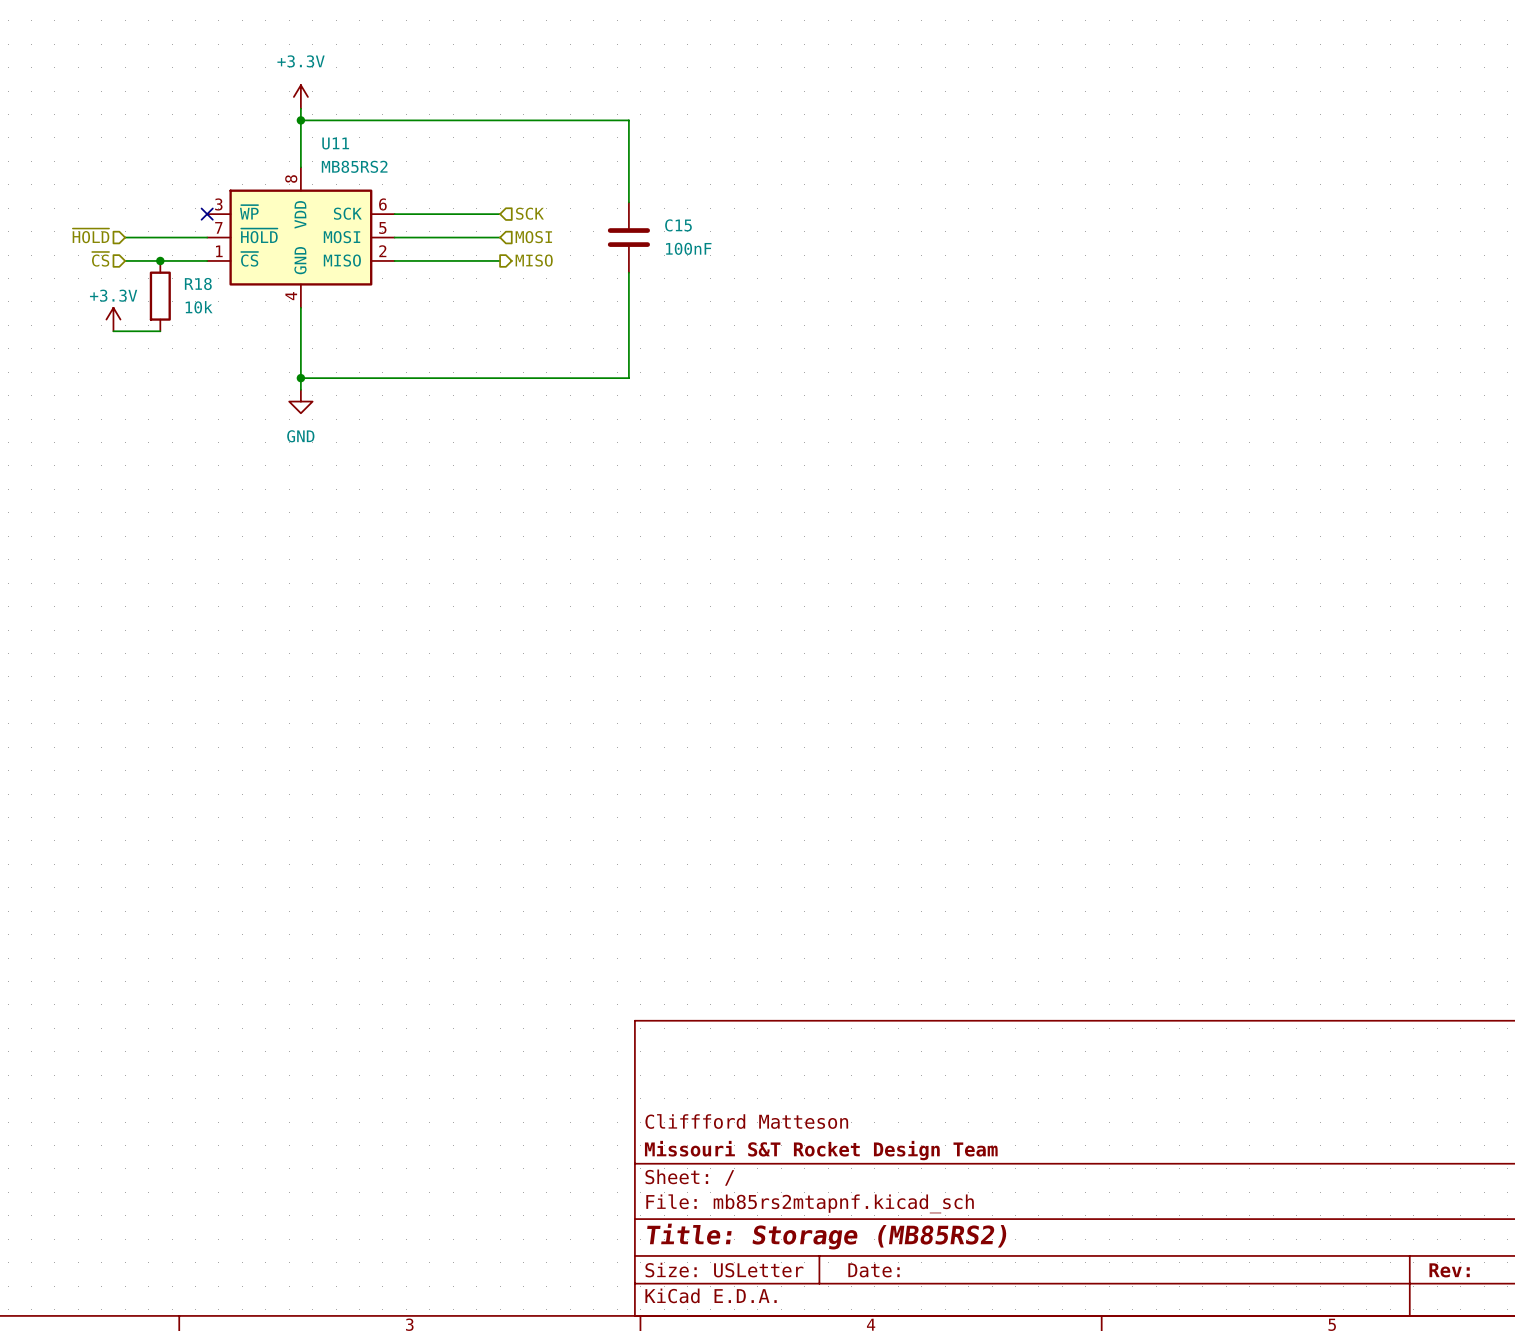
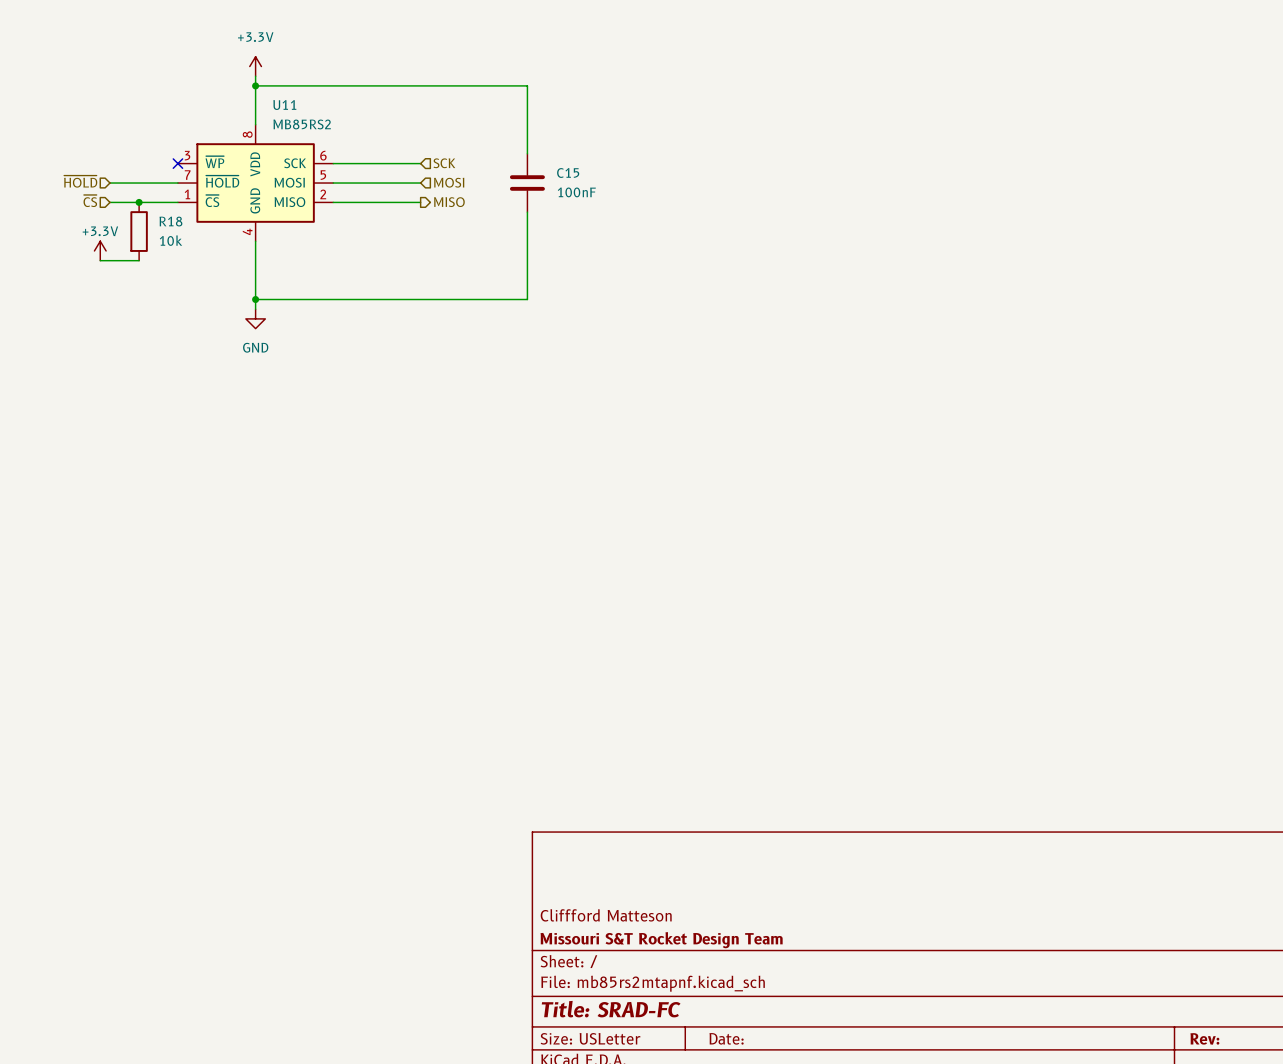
title block: Title: Storage (MB85RS2) (826, 1236) -> Title: SRAD-FC (611, 1009)

